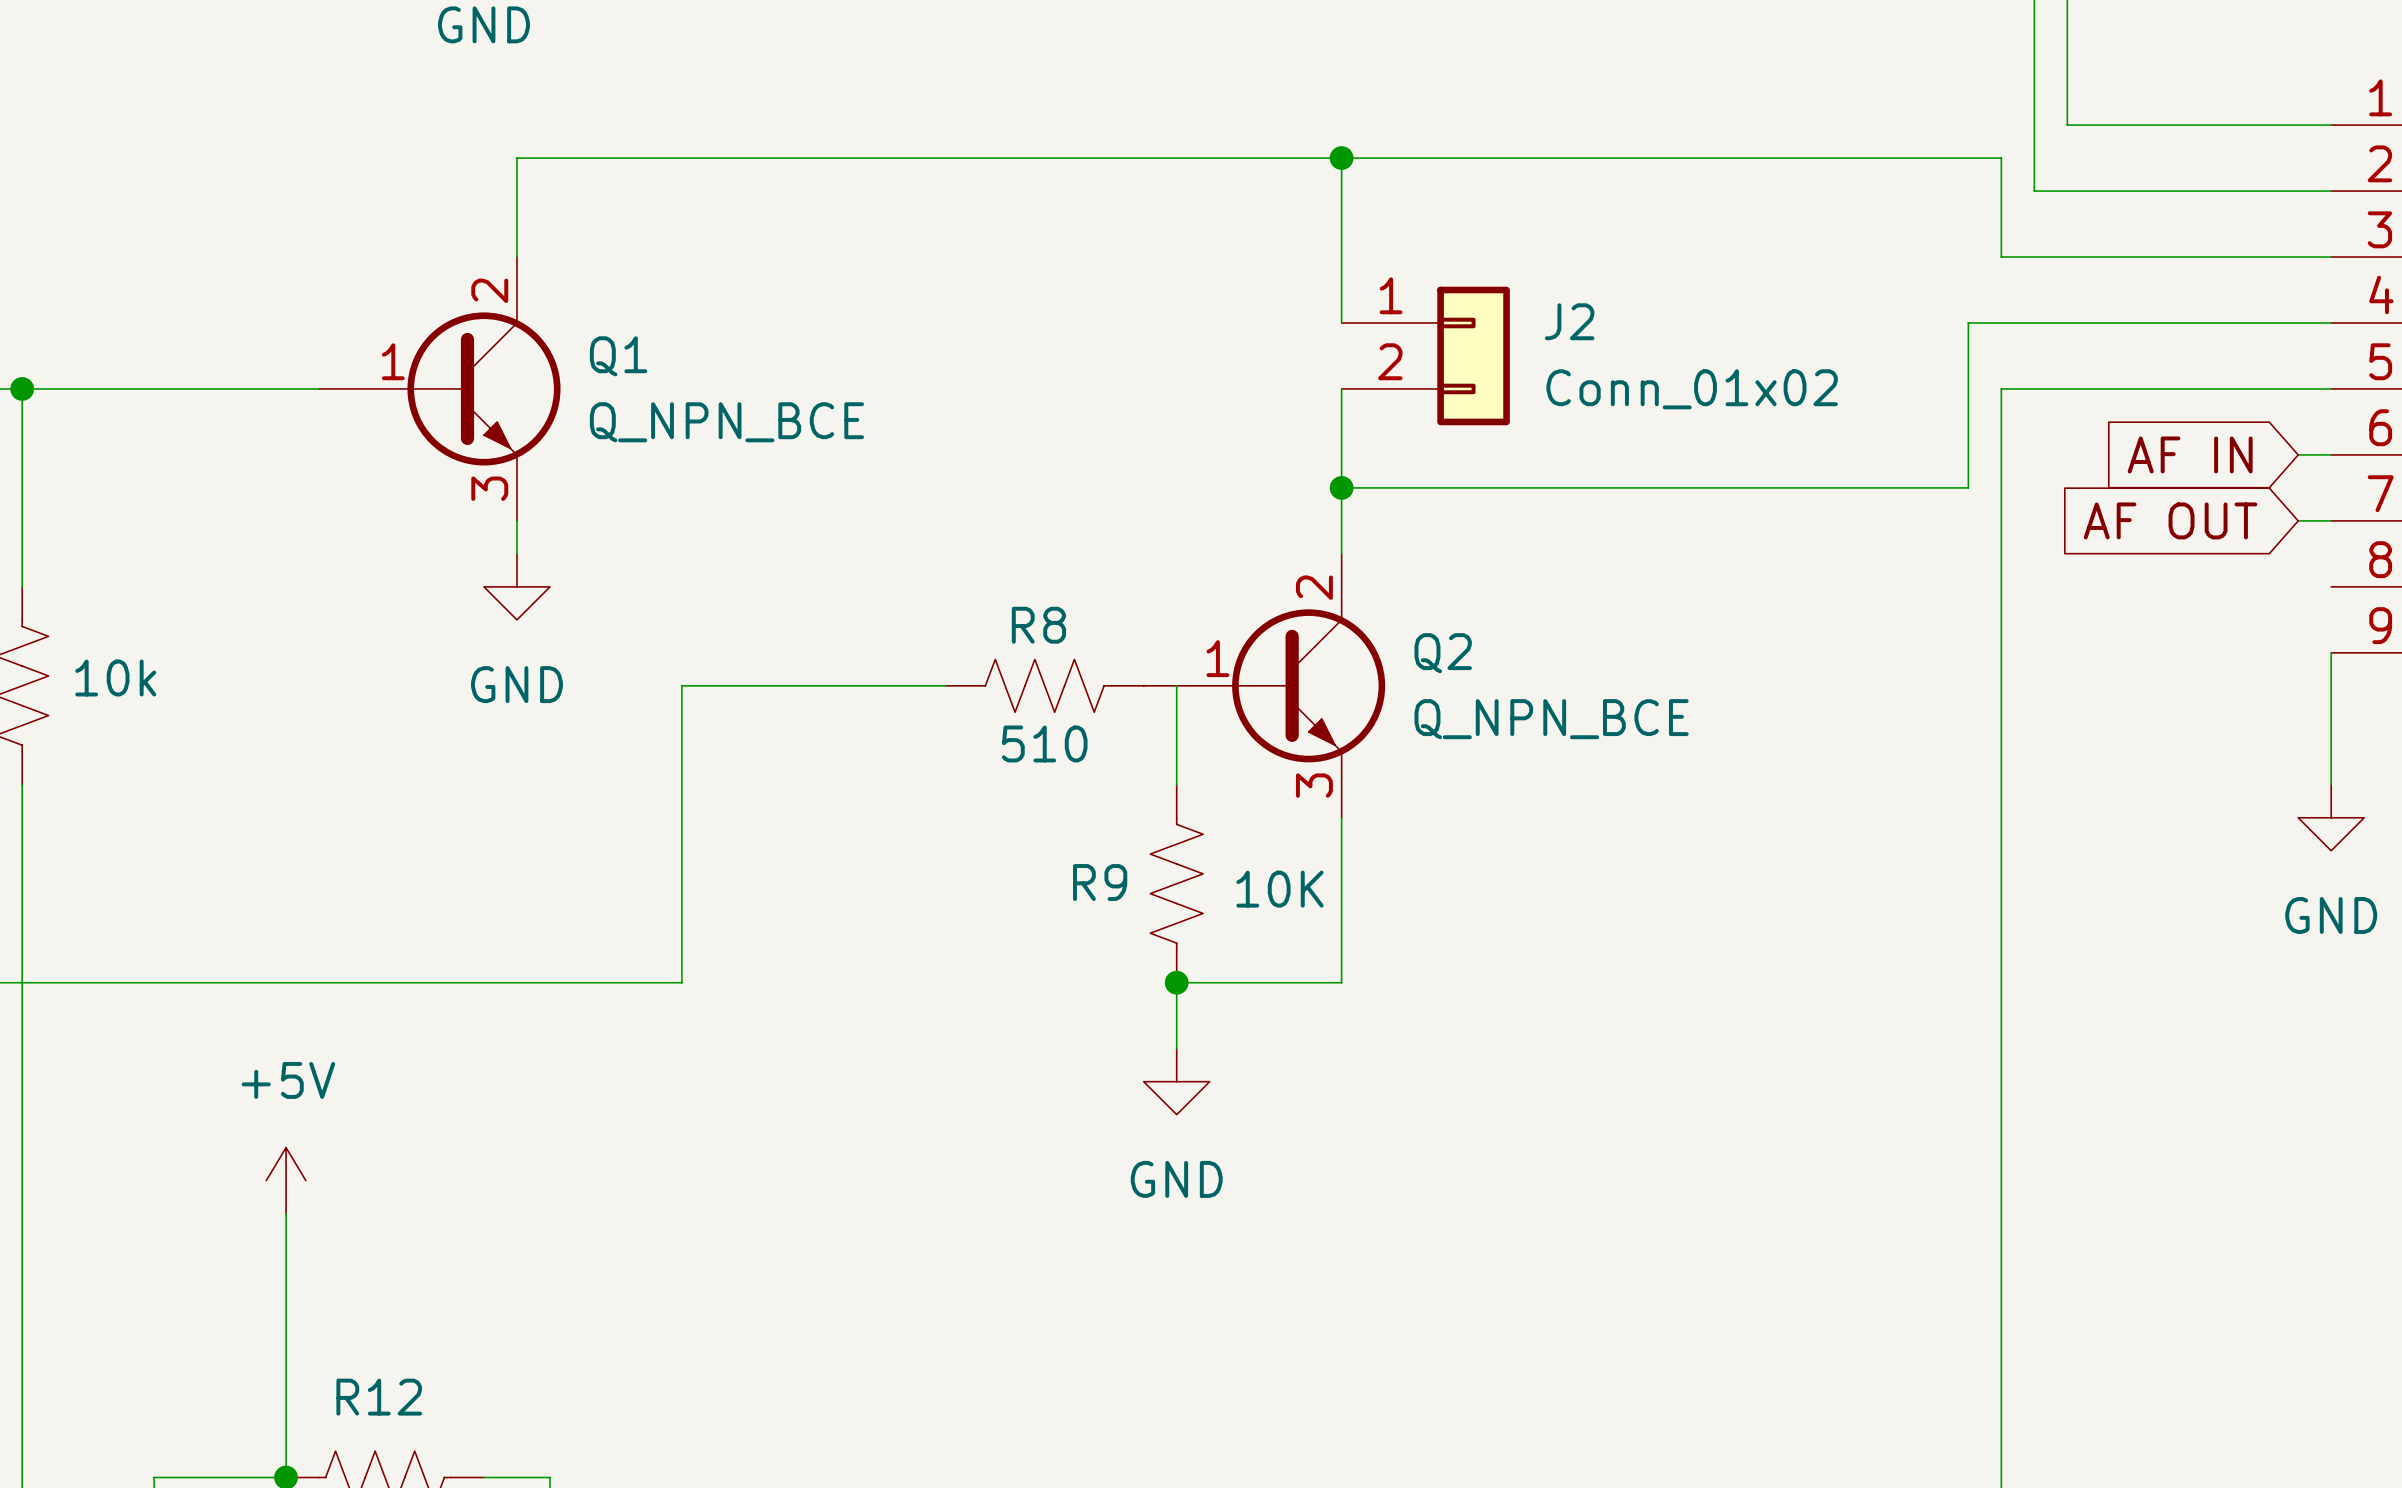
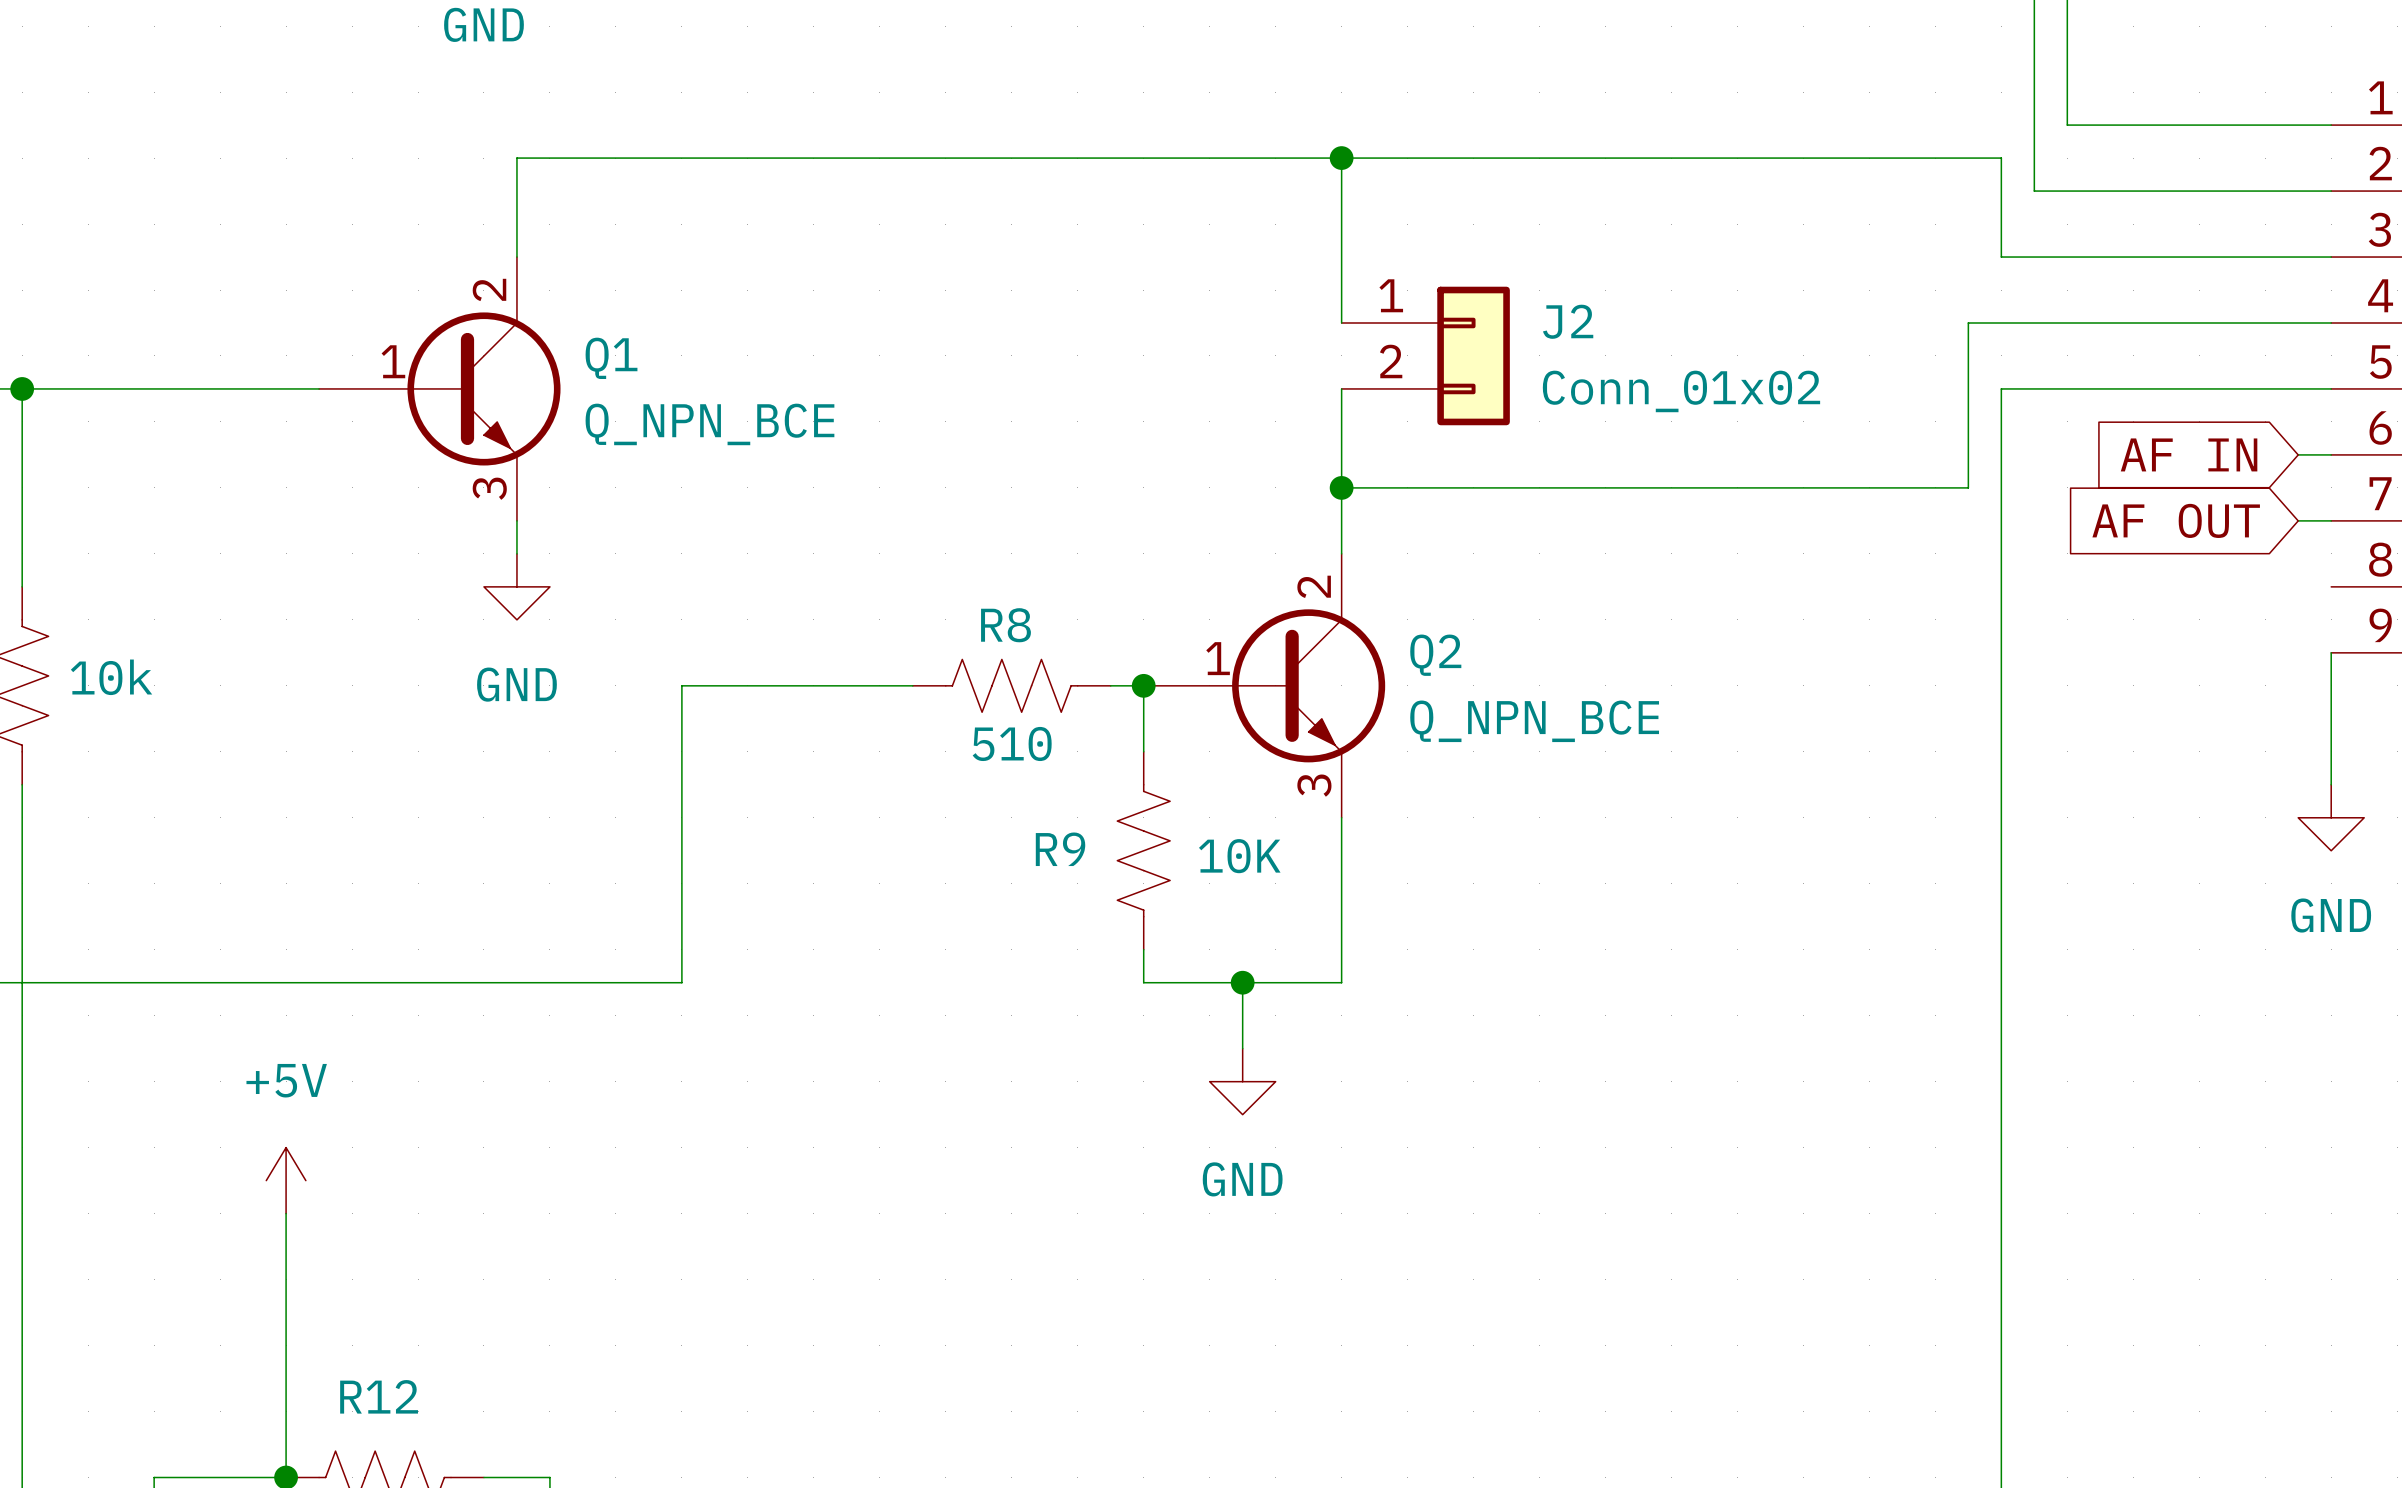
R8 position: (1044, 685) -> (1011, 685)
wire: none -> (1110, 685) (1143, 685) (1143, 751)
junction: none -> (1143, 685)
wire: (1176, 685) (1176, 784) -> none
R9 position: (1176, 883) -> (1143, 850)
wire: (1176, 982) (1176, 1048) -> (1176, 982) (1143, 982) (1143, 949)
junction position: (1176, 982) -> (1242, 982)
wire: none -> (1242, 982) (1242, 1048)
power symbol position: GND (1176, 1081) -> GND (1242, 1081)

